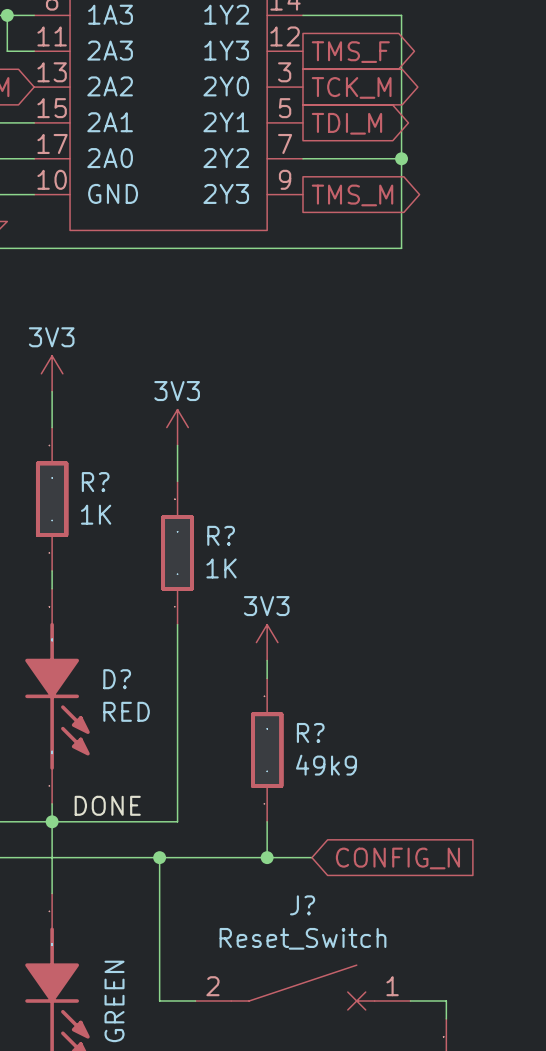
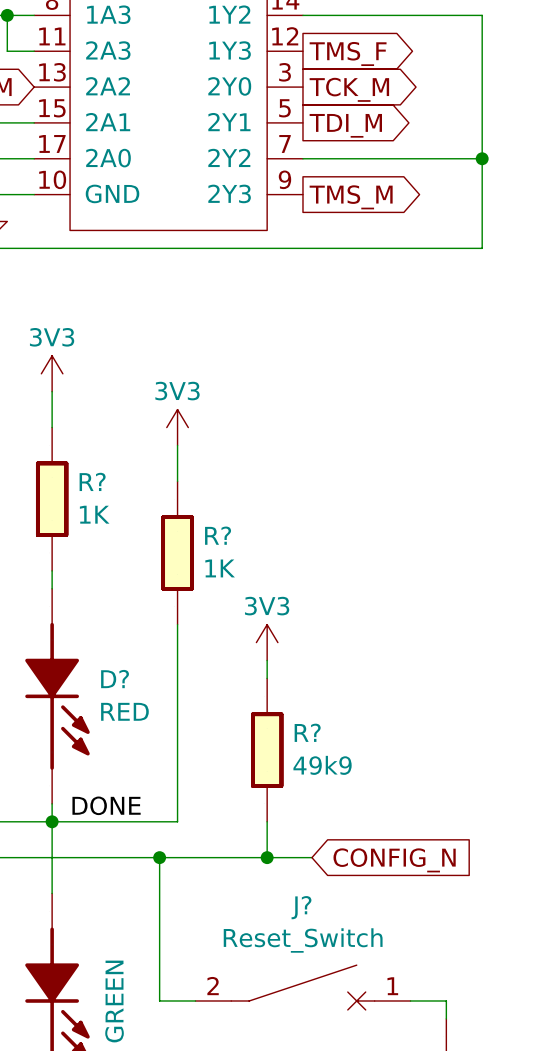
wire: (401, 15) (401, 248) -> (401, 15) (482, 15) (482, 248) (401, 248)
wire: none -> (401, 158) (482, 158)
junction position: (401, 158) -> (482, 158)

